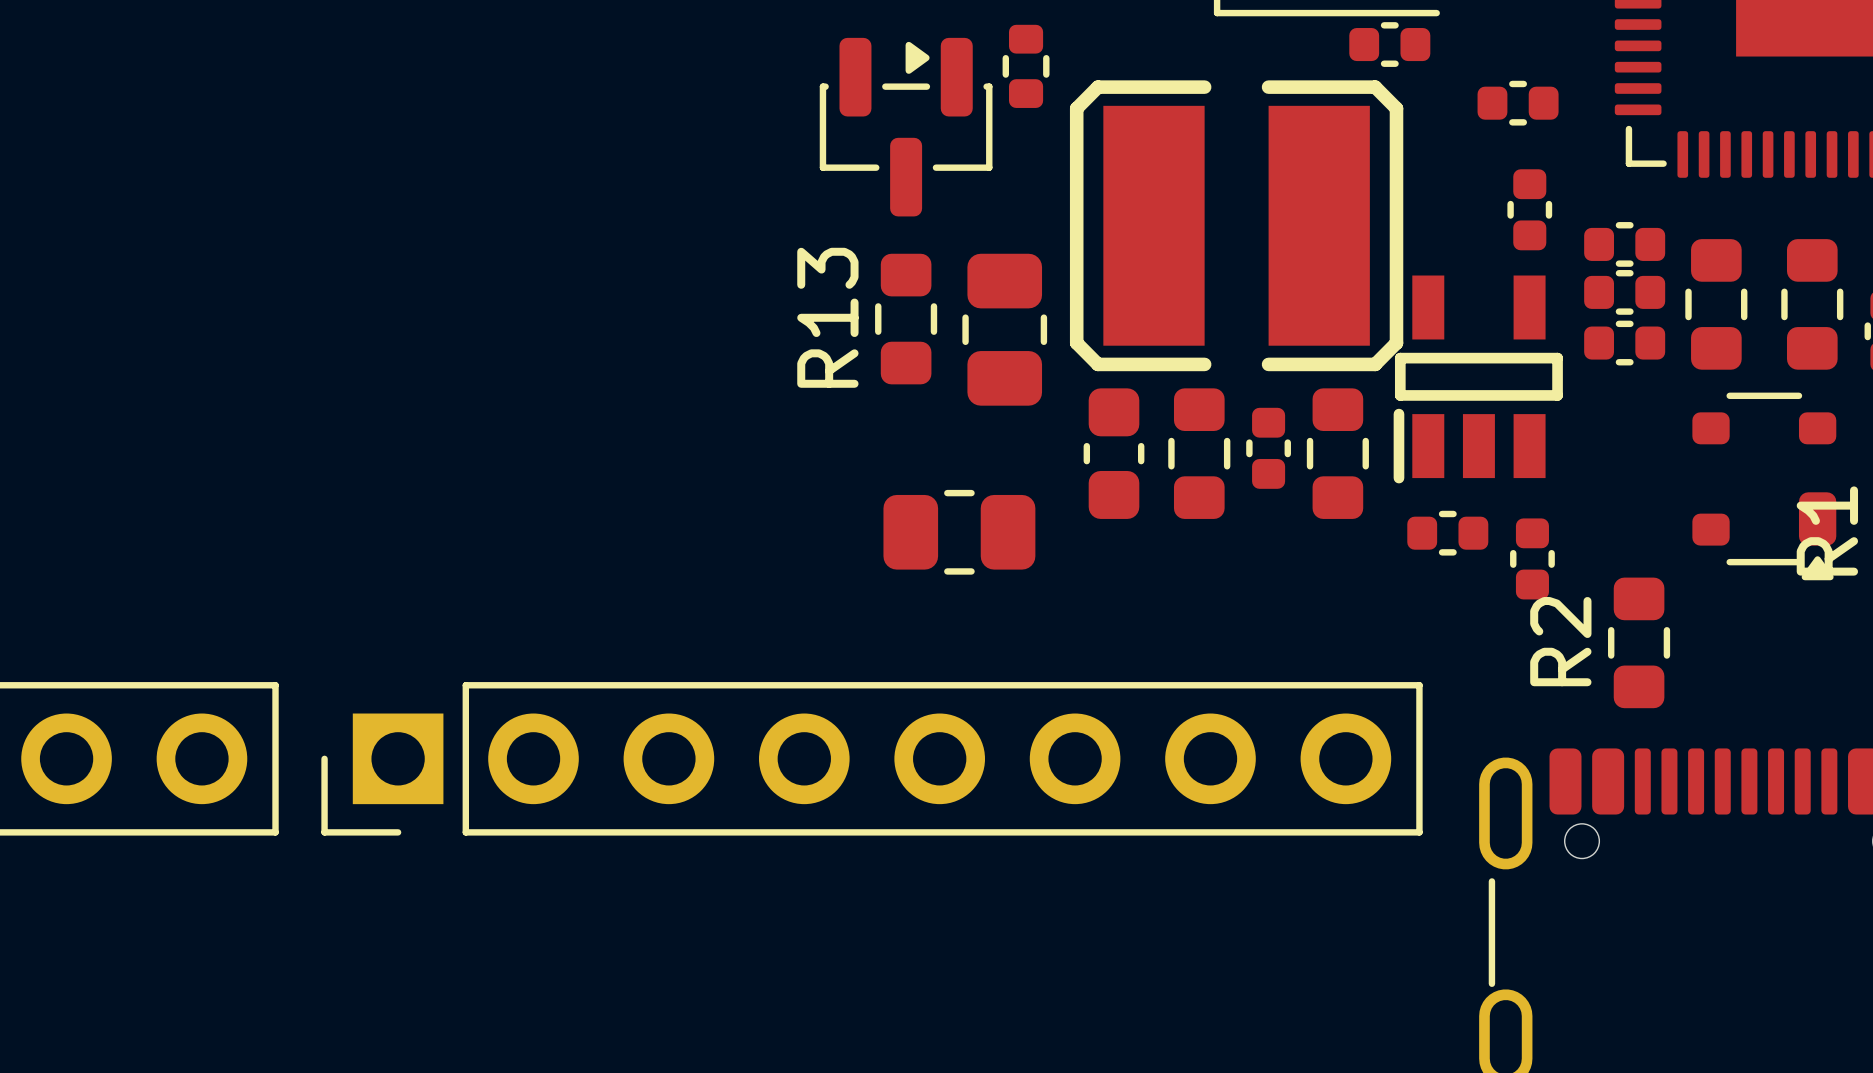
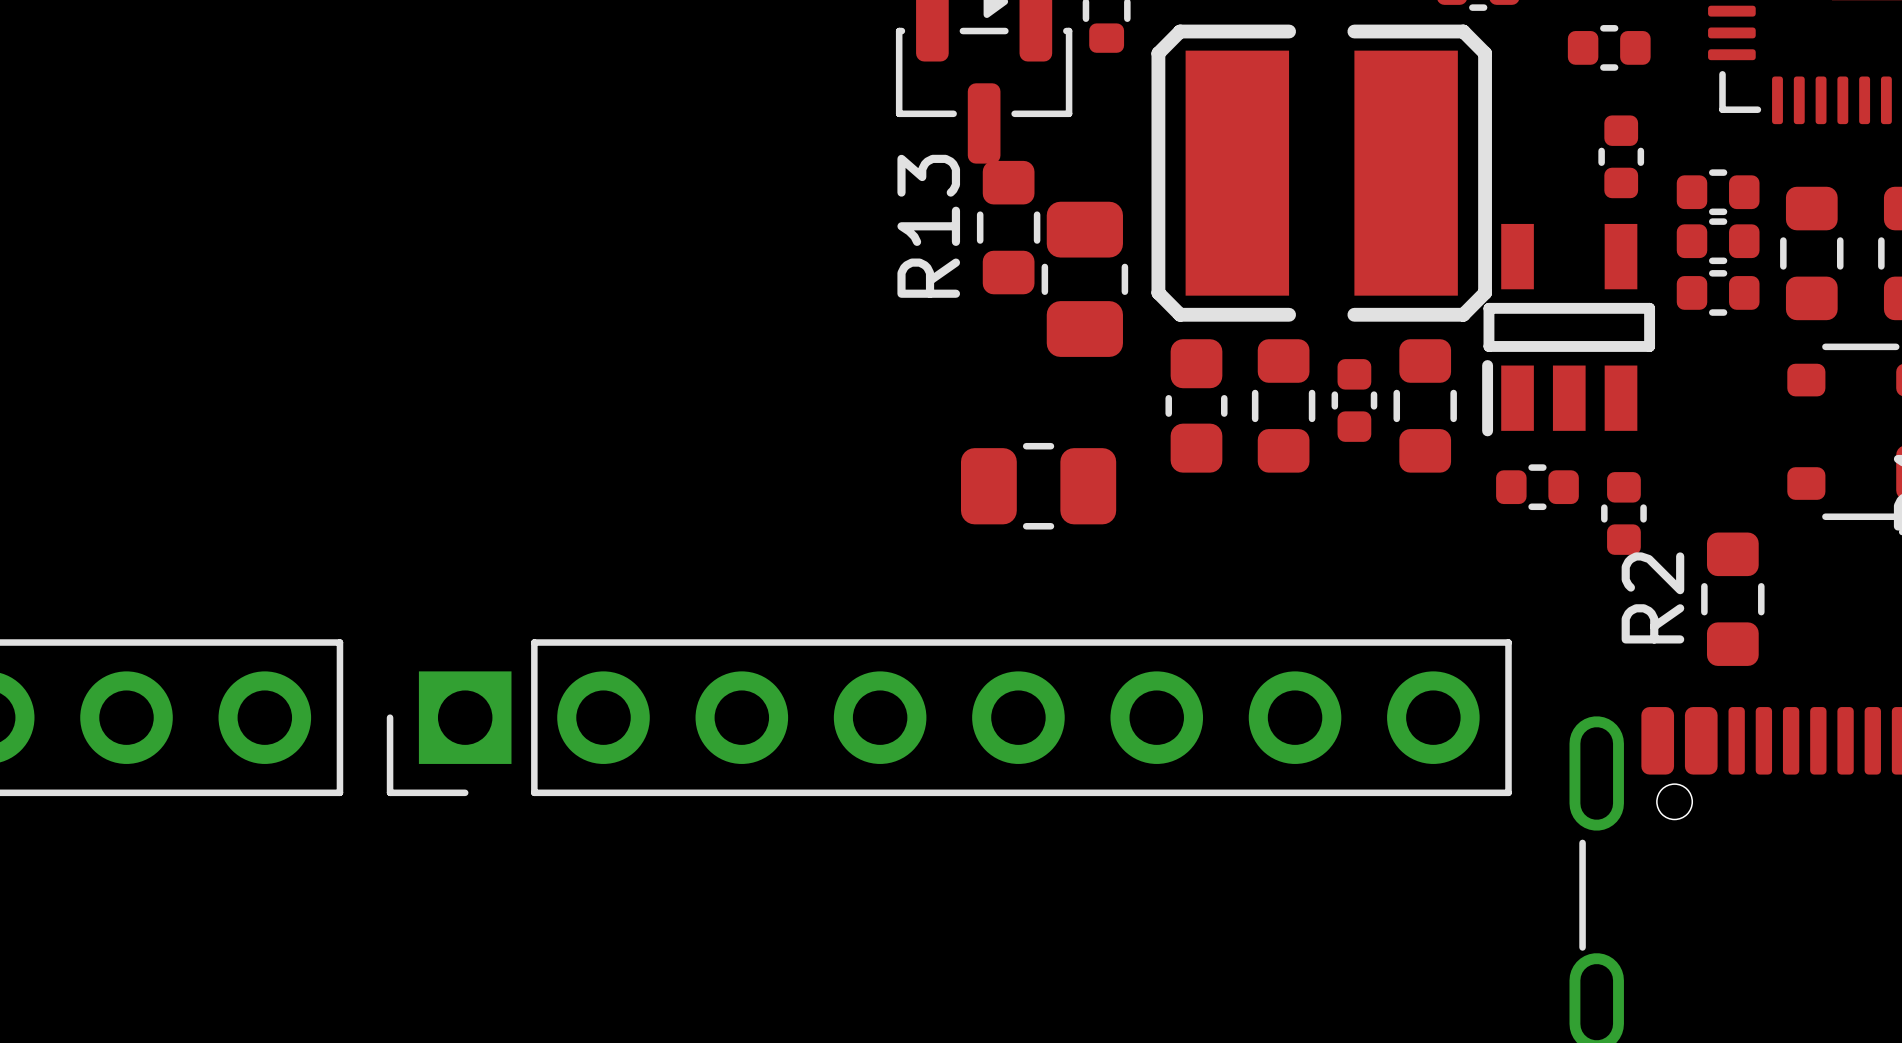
R13 position: (906, 319) -> (1008, 227)

